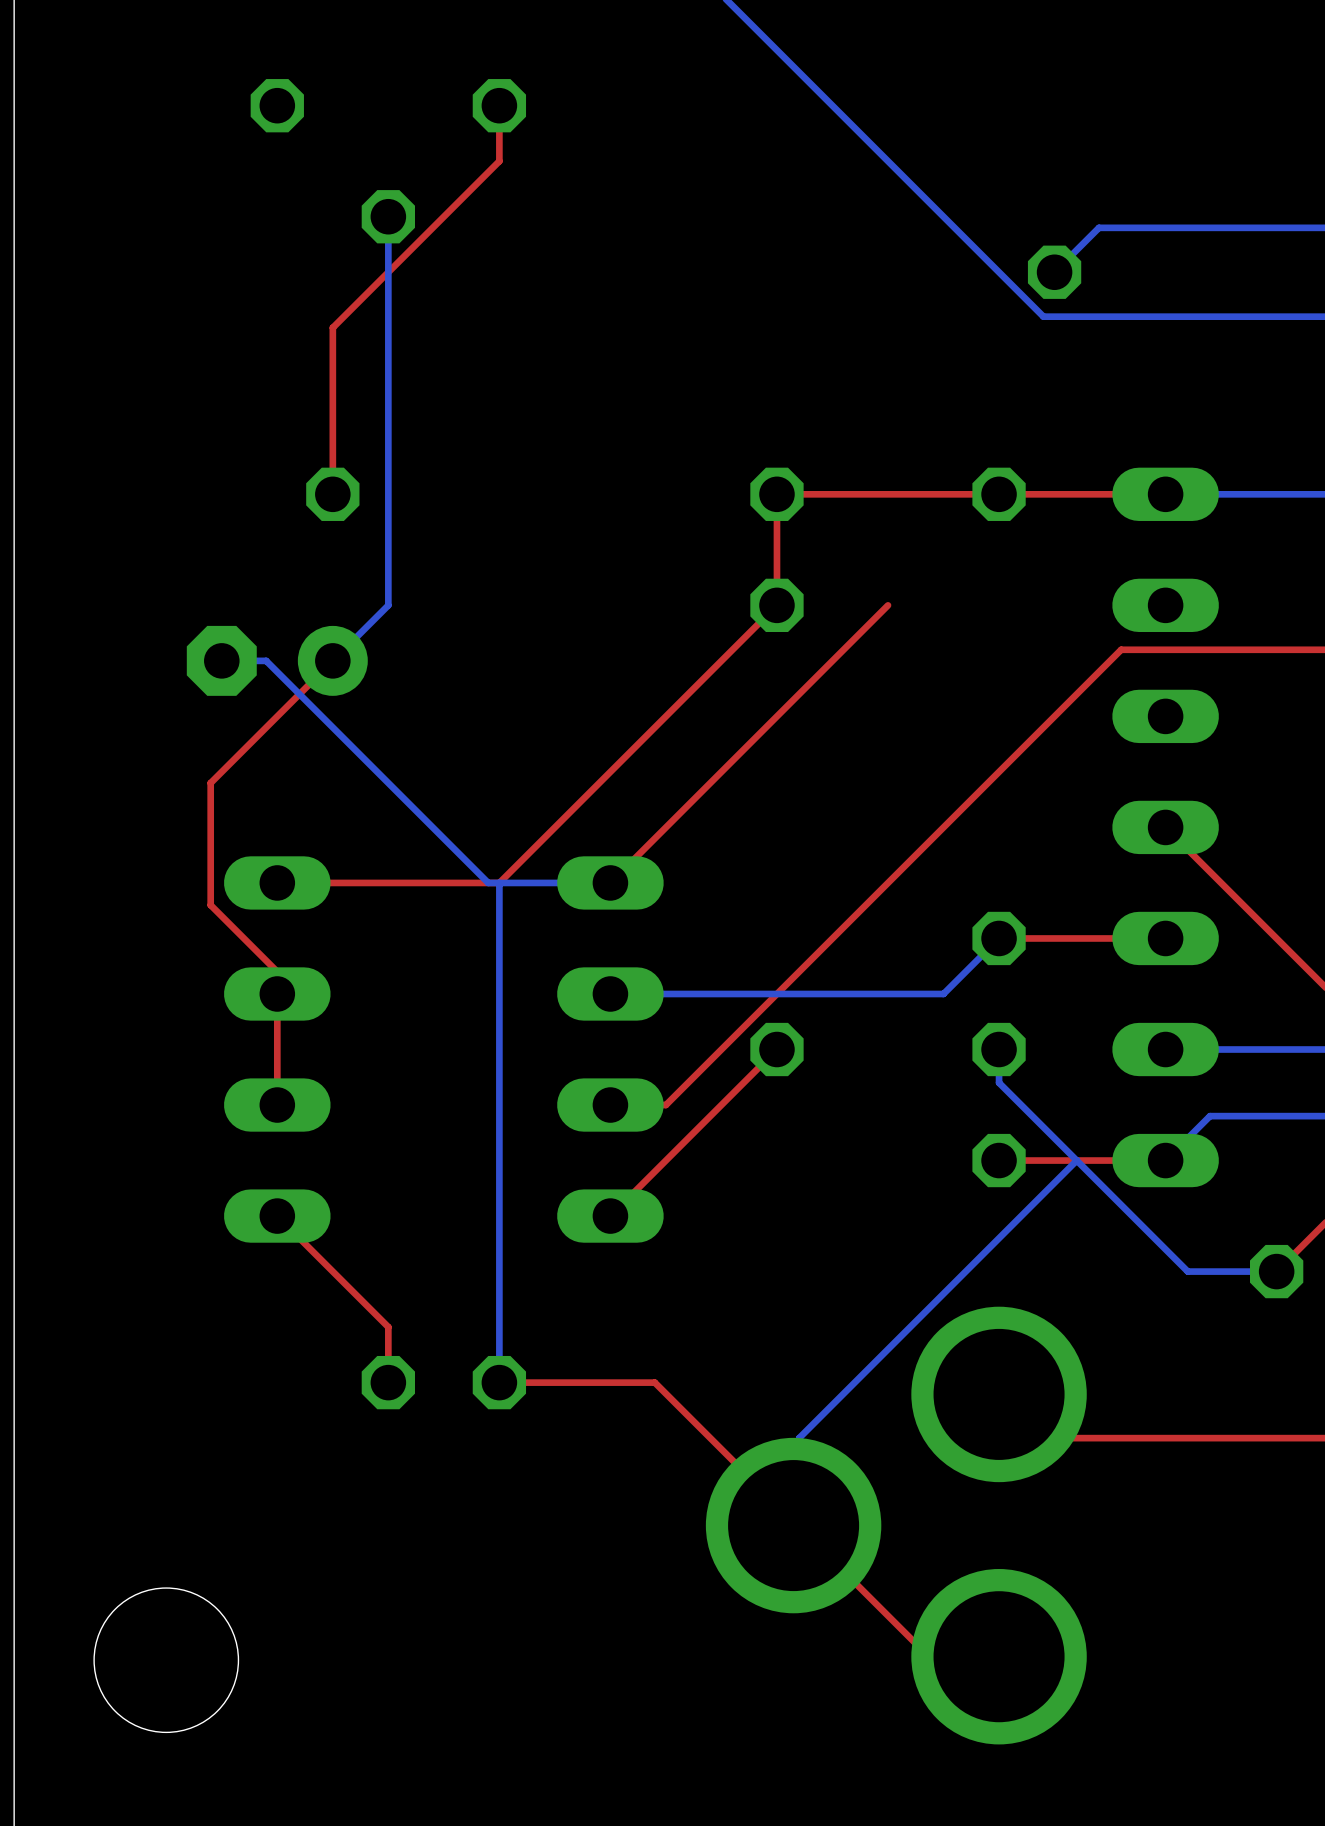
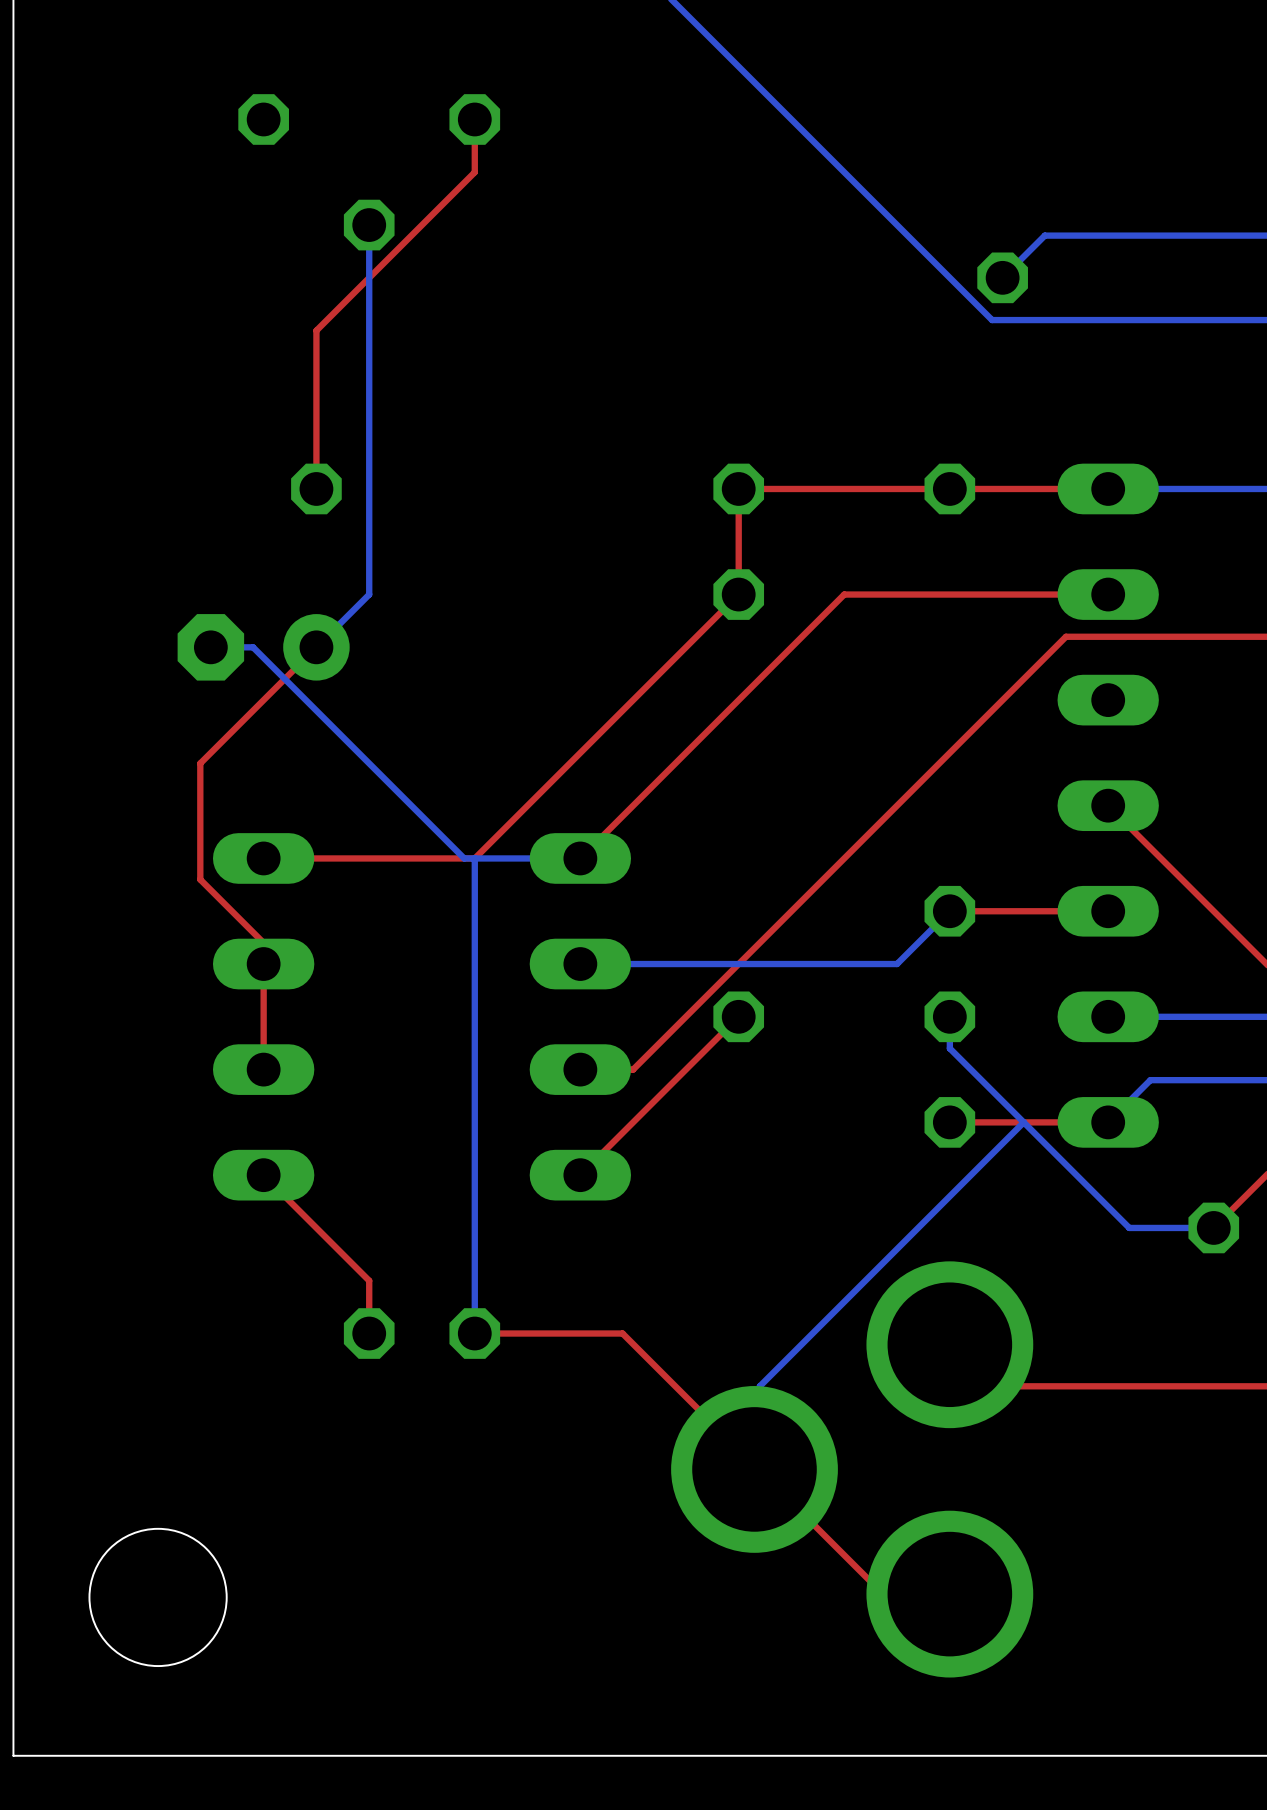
top track: none -> (1108, 594) (844, 594)

